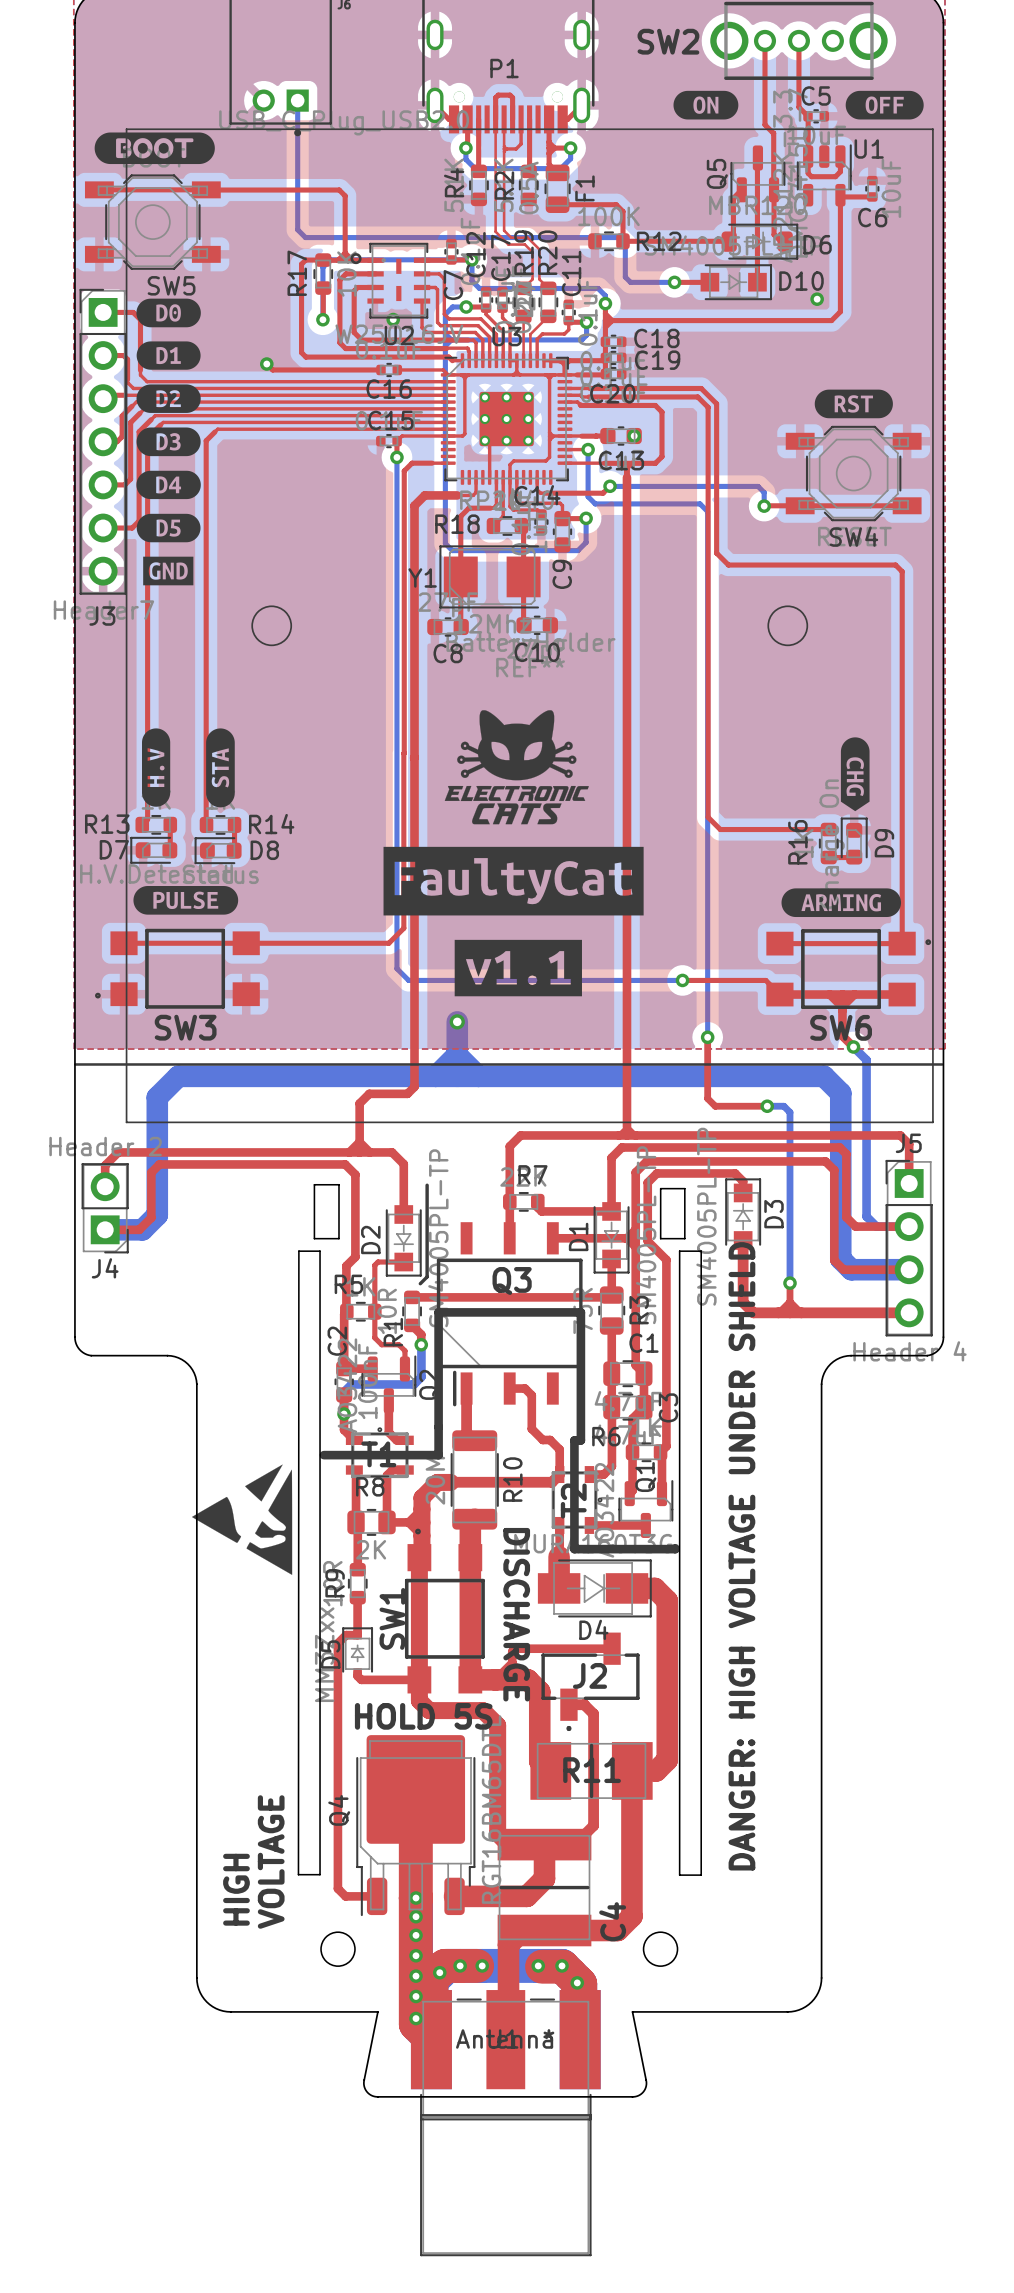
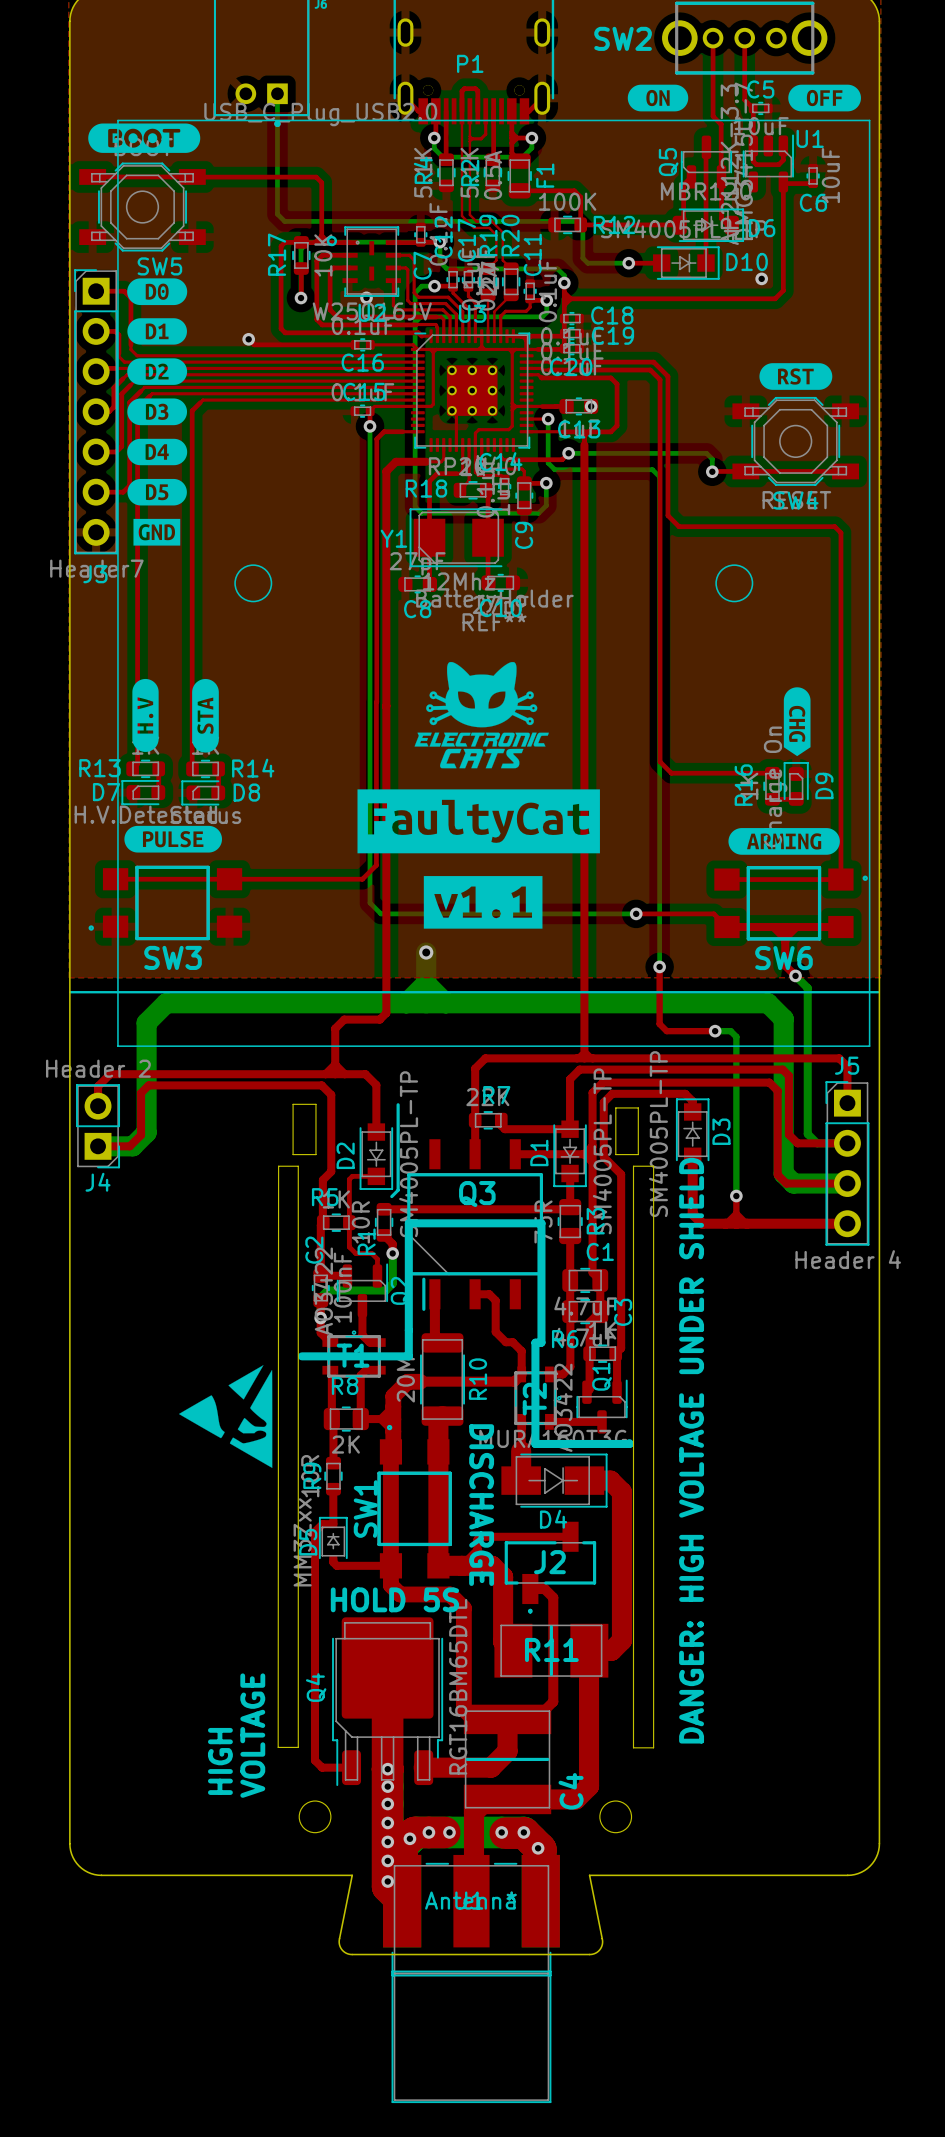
board edge: (74, 1337) (78, 1347) (88, 1355) (167, 1355) (178, 1357) (190, 1366) (196, 1380) (196, 1977) (200, 1992) (206, 2001) (219, 2010) (230, 2011) -> (69, 1246) (70, 1850) (79, 1866) (94, 1874) (215, 1875)
board edge: (943, 1337) (940, 1347) (929, 1355) (851, 1355) (840, 1357) (828, 1366) (821, 1380) (821, 1977) (818, 1992) (811, 2001) (802, 2008) (787, 2011) -> (879, 1246) (878, 1850) (870, 1866) (854, 1874) (734, 1875)

